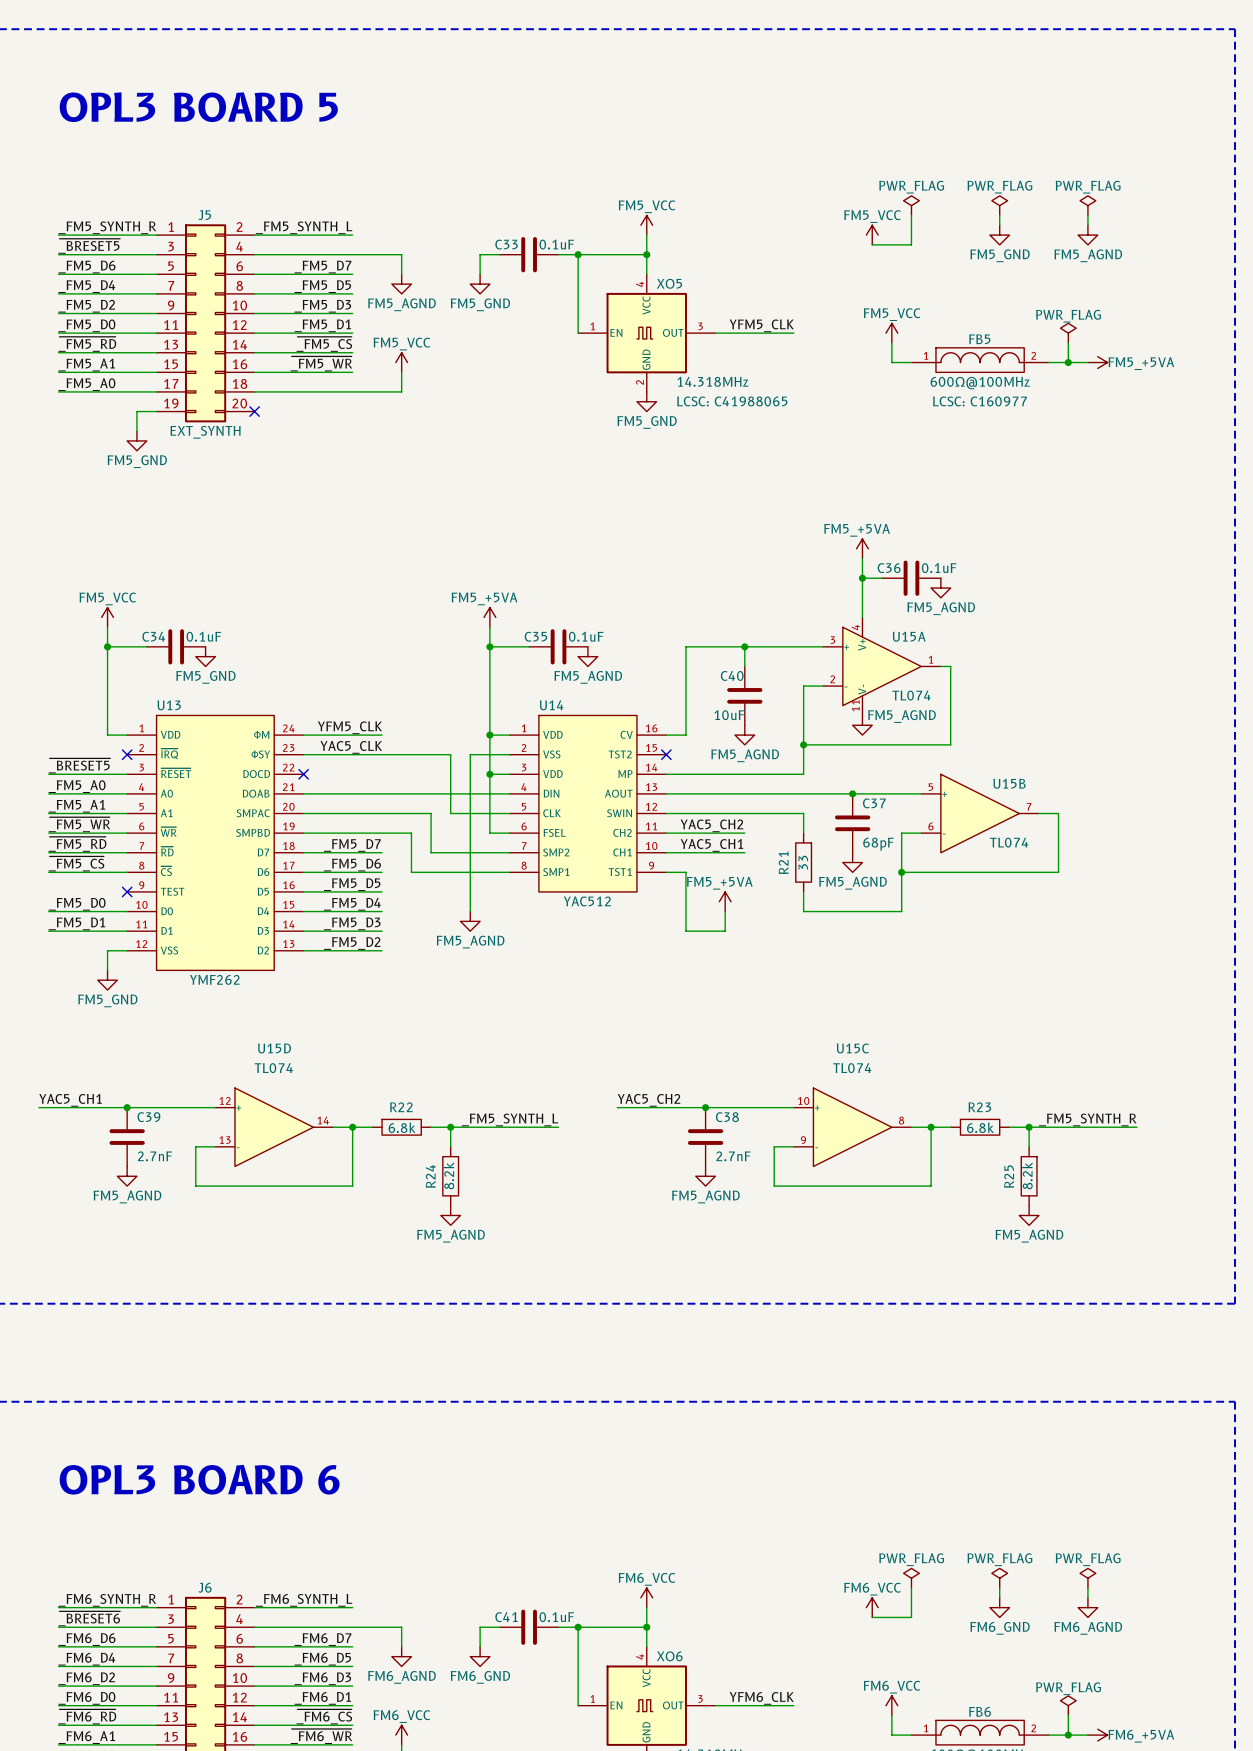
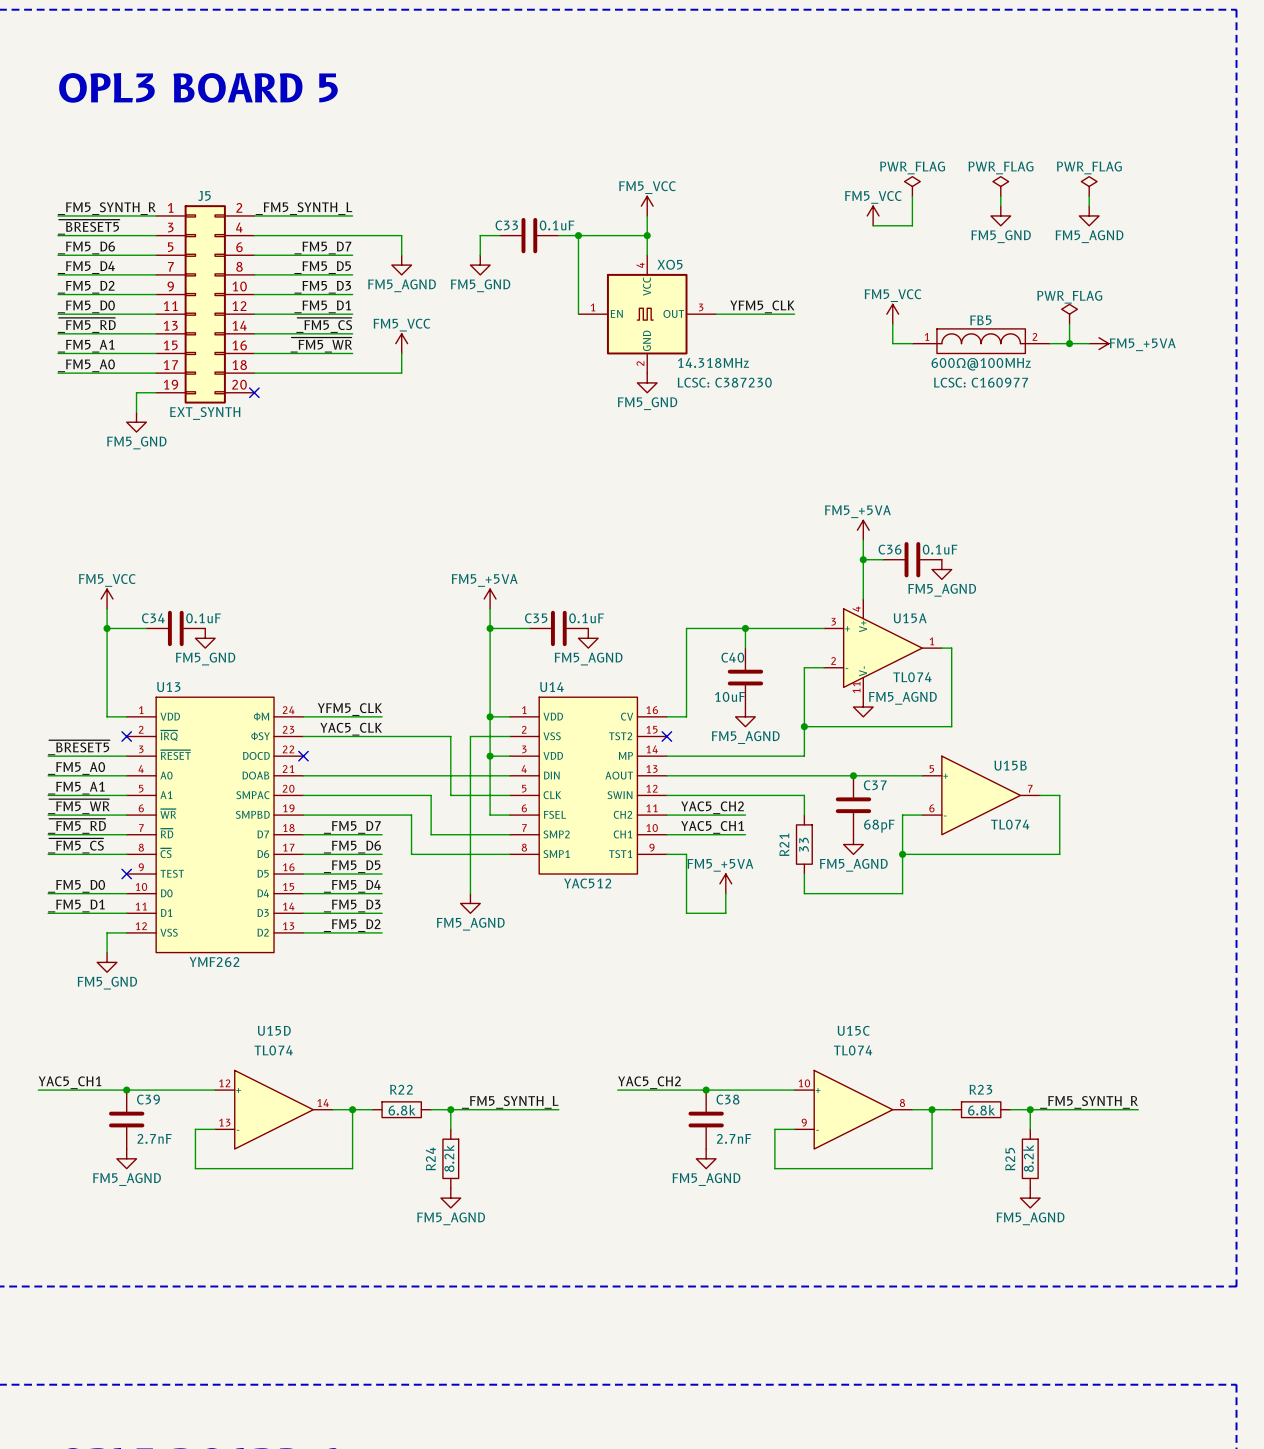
XO5 text: LCSC: C41988065 (732, 401) -> LCSC: C387230 (724, 382)

